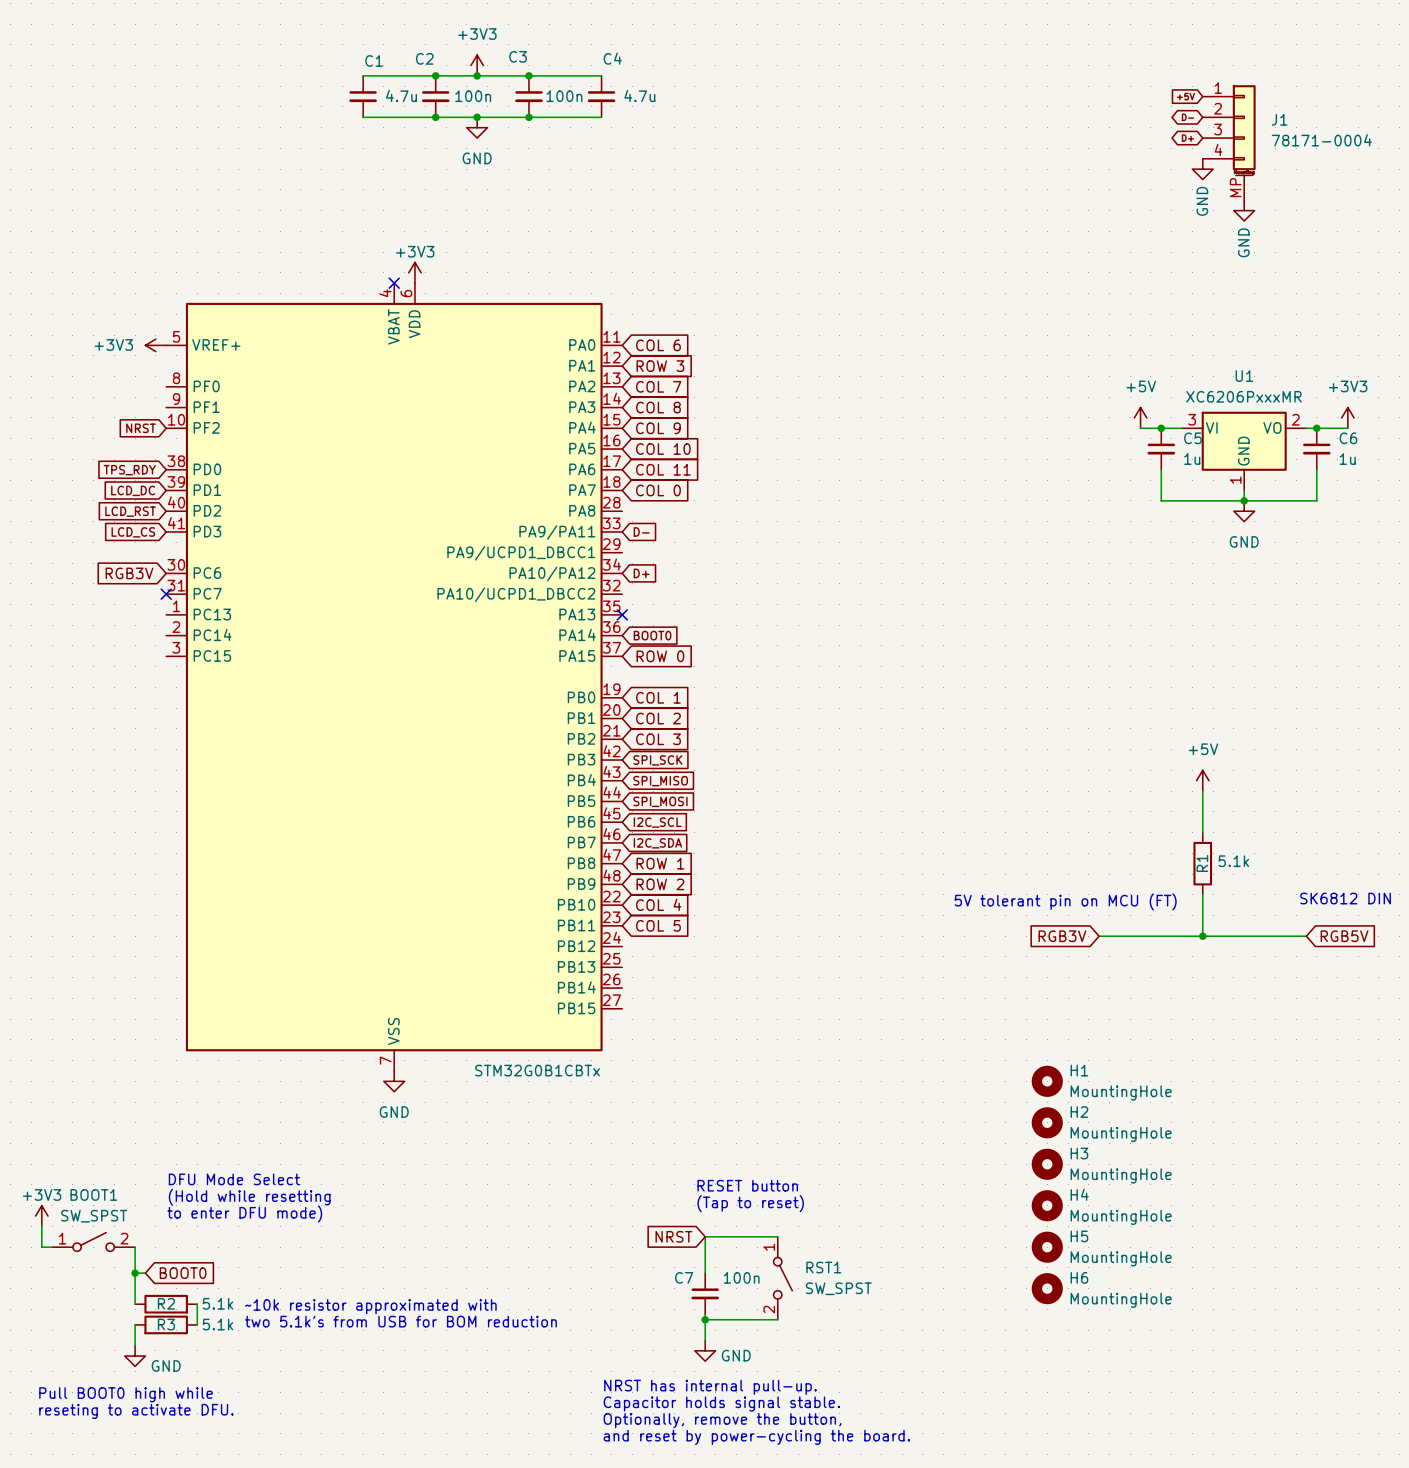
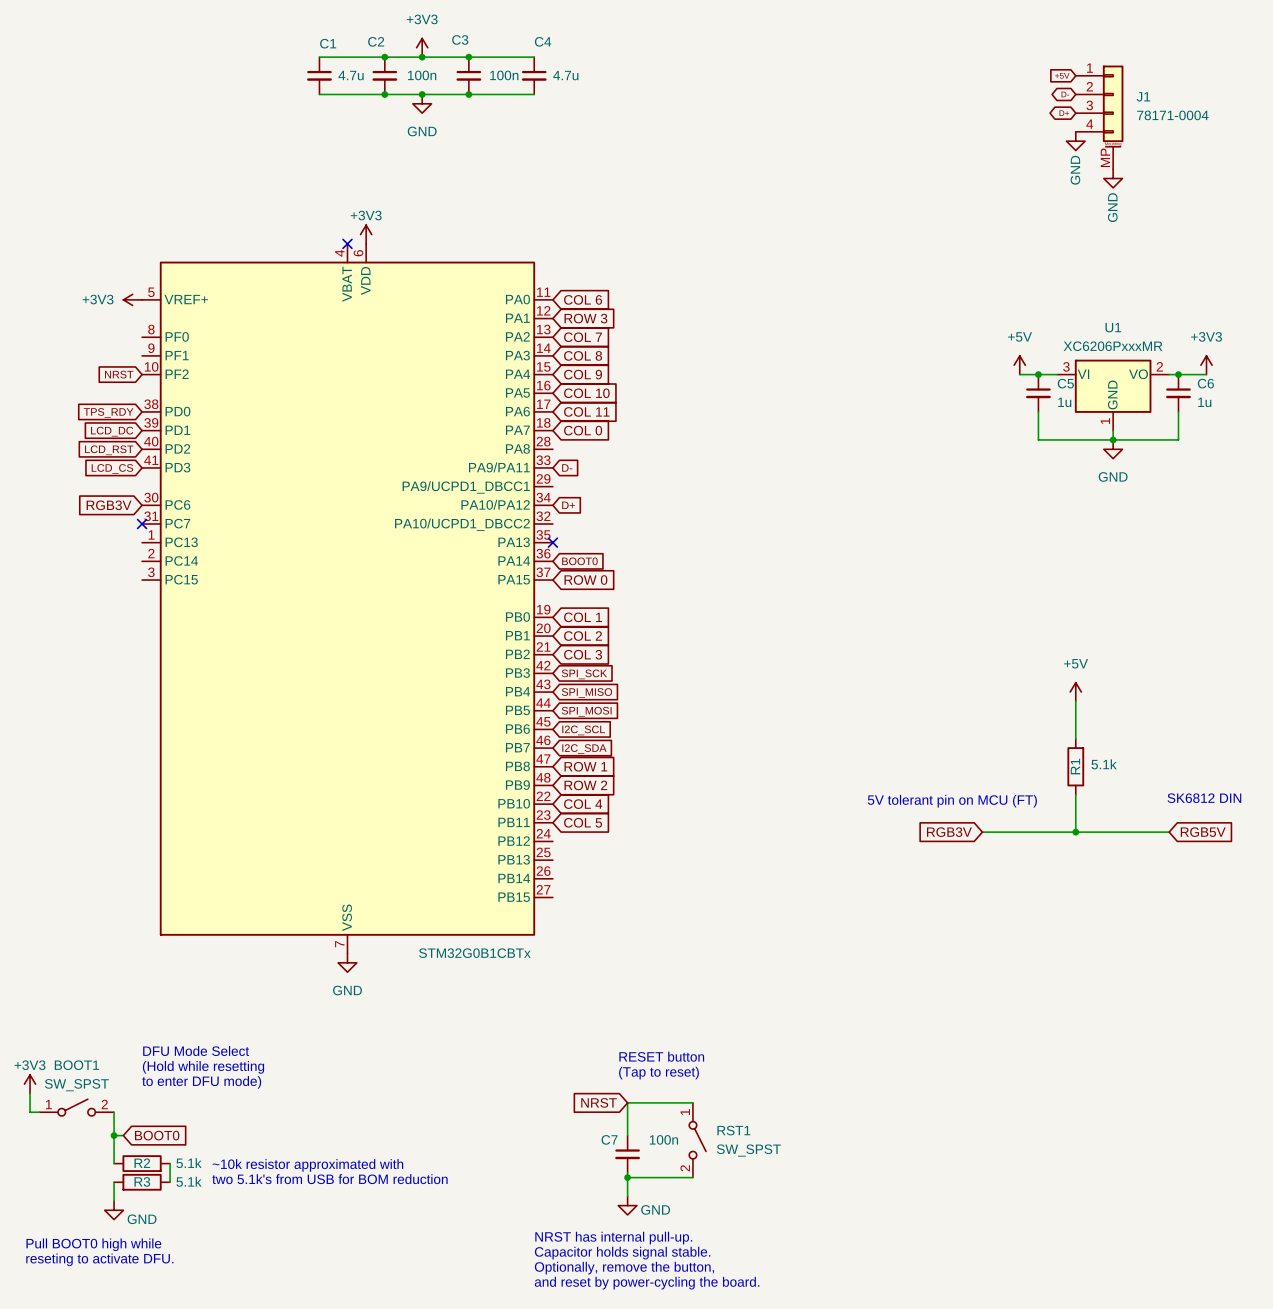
H1: MountingHole (1047, 1081) -> none
H2: MountingHole (1047, 1122) -> none
H3: MountingHole (1047, 1164) -> none
H4: MountingHole (1047, 1205) -> none
H5: MountingHole (1047, 1247) -> none
H6: MountingHole (1047, 1288) -> none

